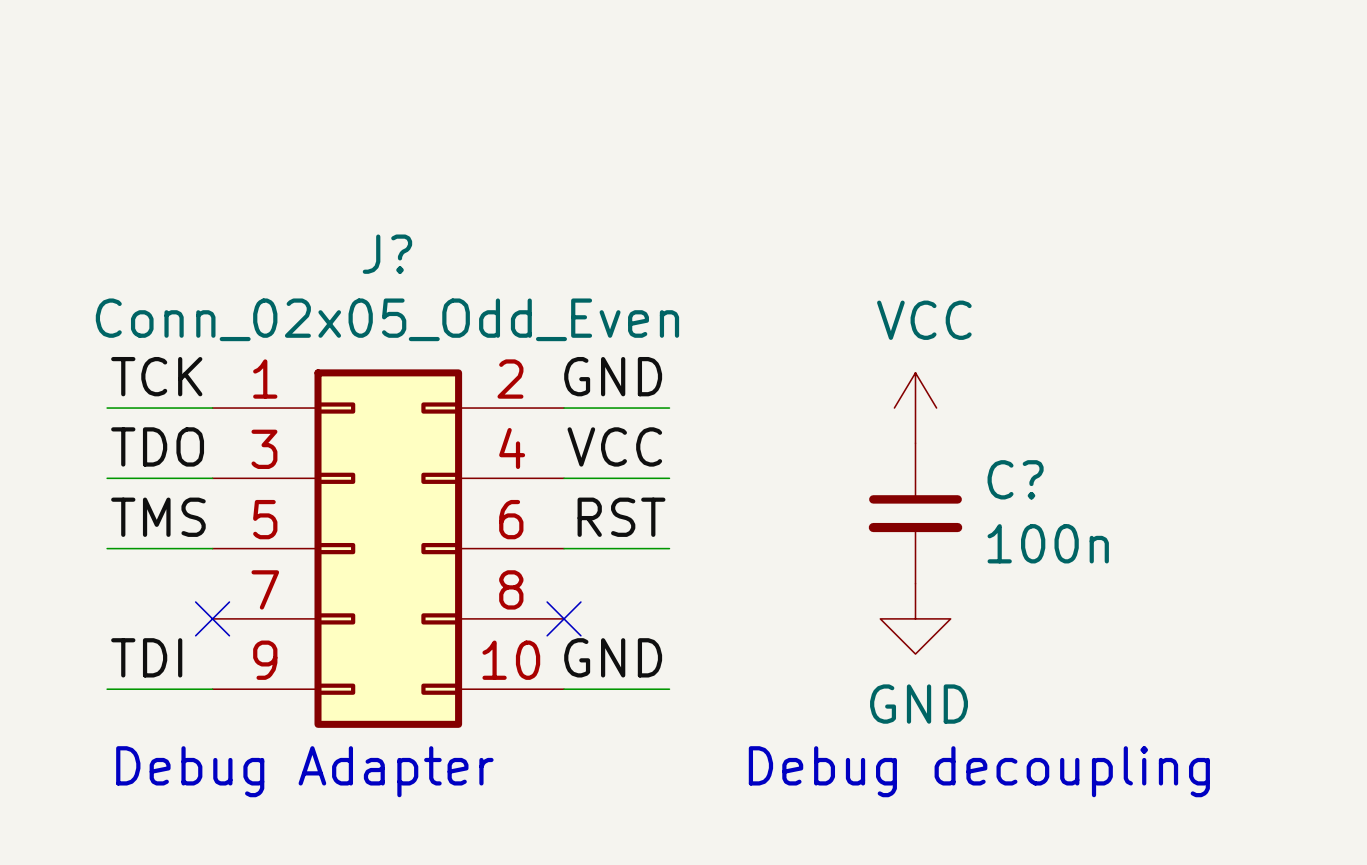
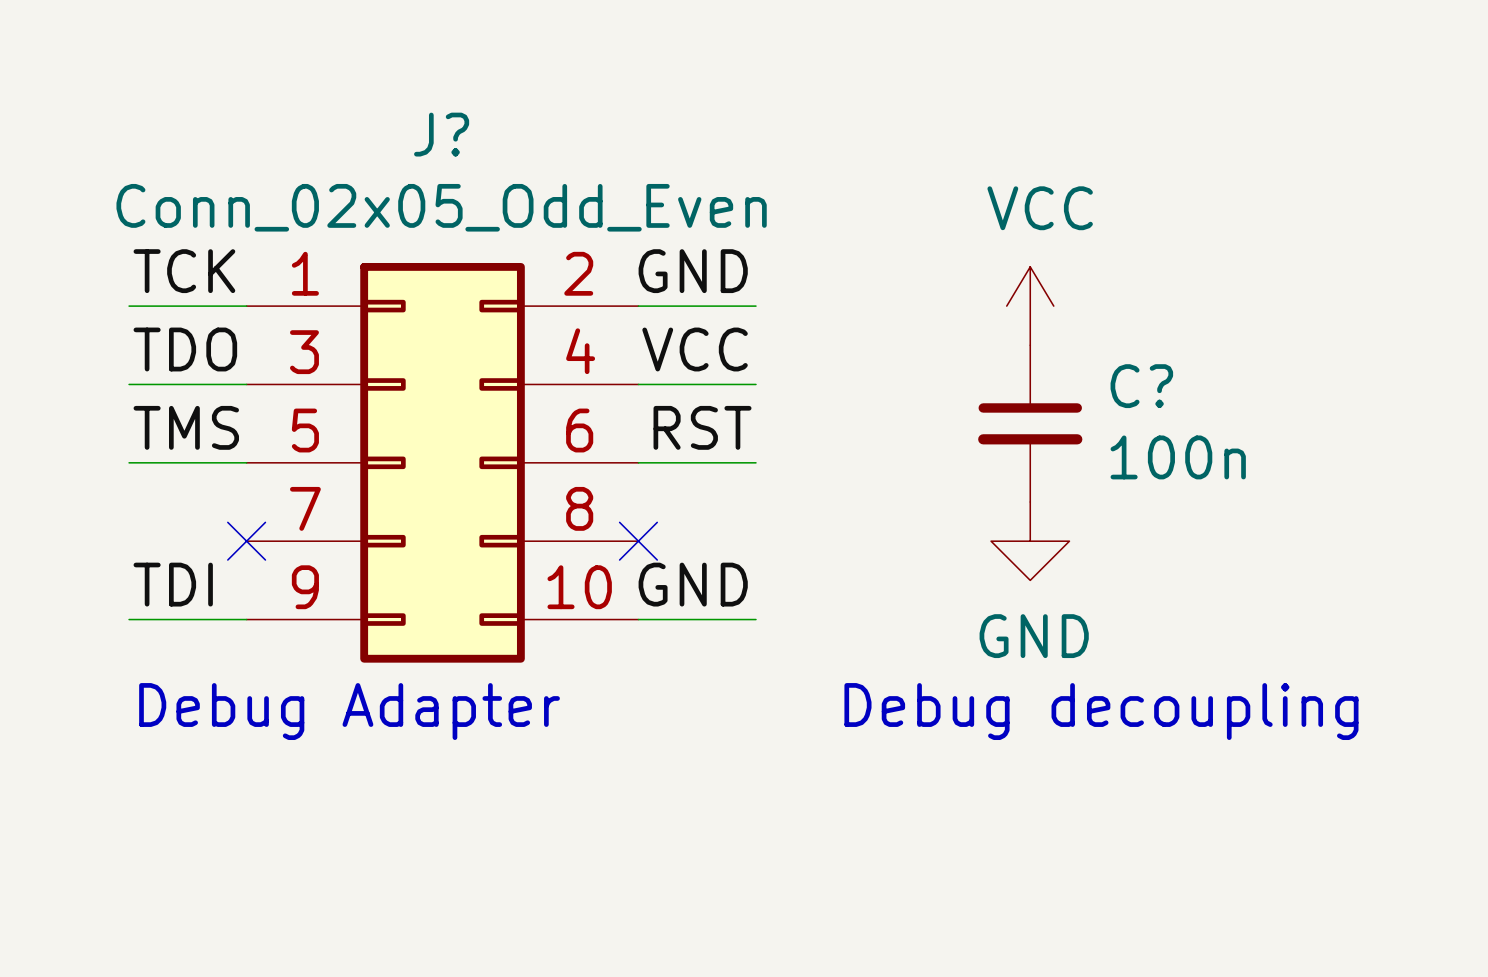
label: none -> TCK (184, 271)
label: TCK (156, 376) -> TMS (186, 427)
label: GND (613, 376) -> RST (702, 427)
power symbol position: VCC (915, 408) -> VCC (1030, 306)
label position: TDO (157, 446) -> TDO (185, 349)
label position: VCC (614, 446) -> VCC (695, 349)
wire: (107, 478) (212, 478) -> (129, 384) (246, 384)
wire: (564, 478) (669, 478) -> (638, 384) (755, 384)
C? position: (915, 513) -> (1030, 423)
label: TMS (158, 517) -> TDI (173, 584)
label: RST (621, 517) -> GND (693, 584)
J? position: (388, 548) -> (442, 462)
no-connect mark position: (212, 618) -> (246, 541)
no-connect mark position: (564, 618) -> (638, 541)
power symbol position: GND (915, 618) -> GND (1030, 541)
label: TDI (146, 657) -> none
label position: GND (613, 657) -> GND (693, 271)
wire: (107, 689) (212, 689) -> (129, 306) (246, 306)
wire: (564, 689) (669, 689) -> (638, 306) (755, 306)
text position: Debug Adapter (304, 771) -> Debug Adapter (349, 711)
text position: Debug decoupling (979, 771) -> Debug decoupling (1101, 711)

